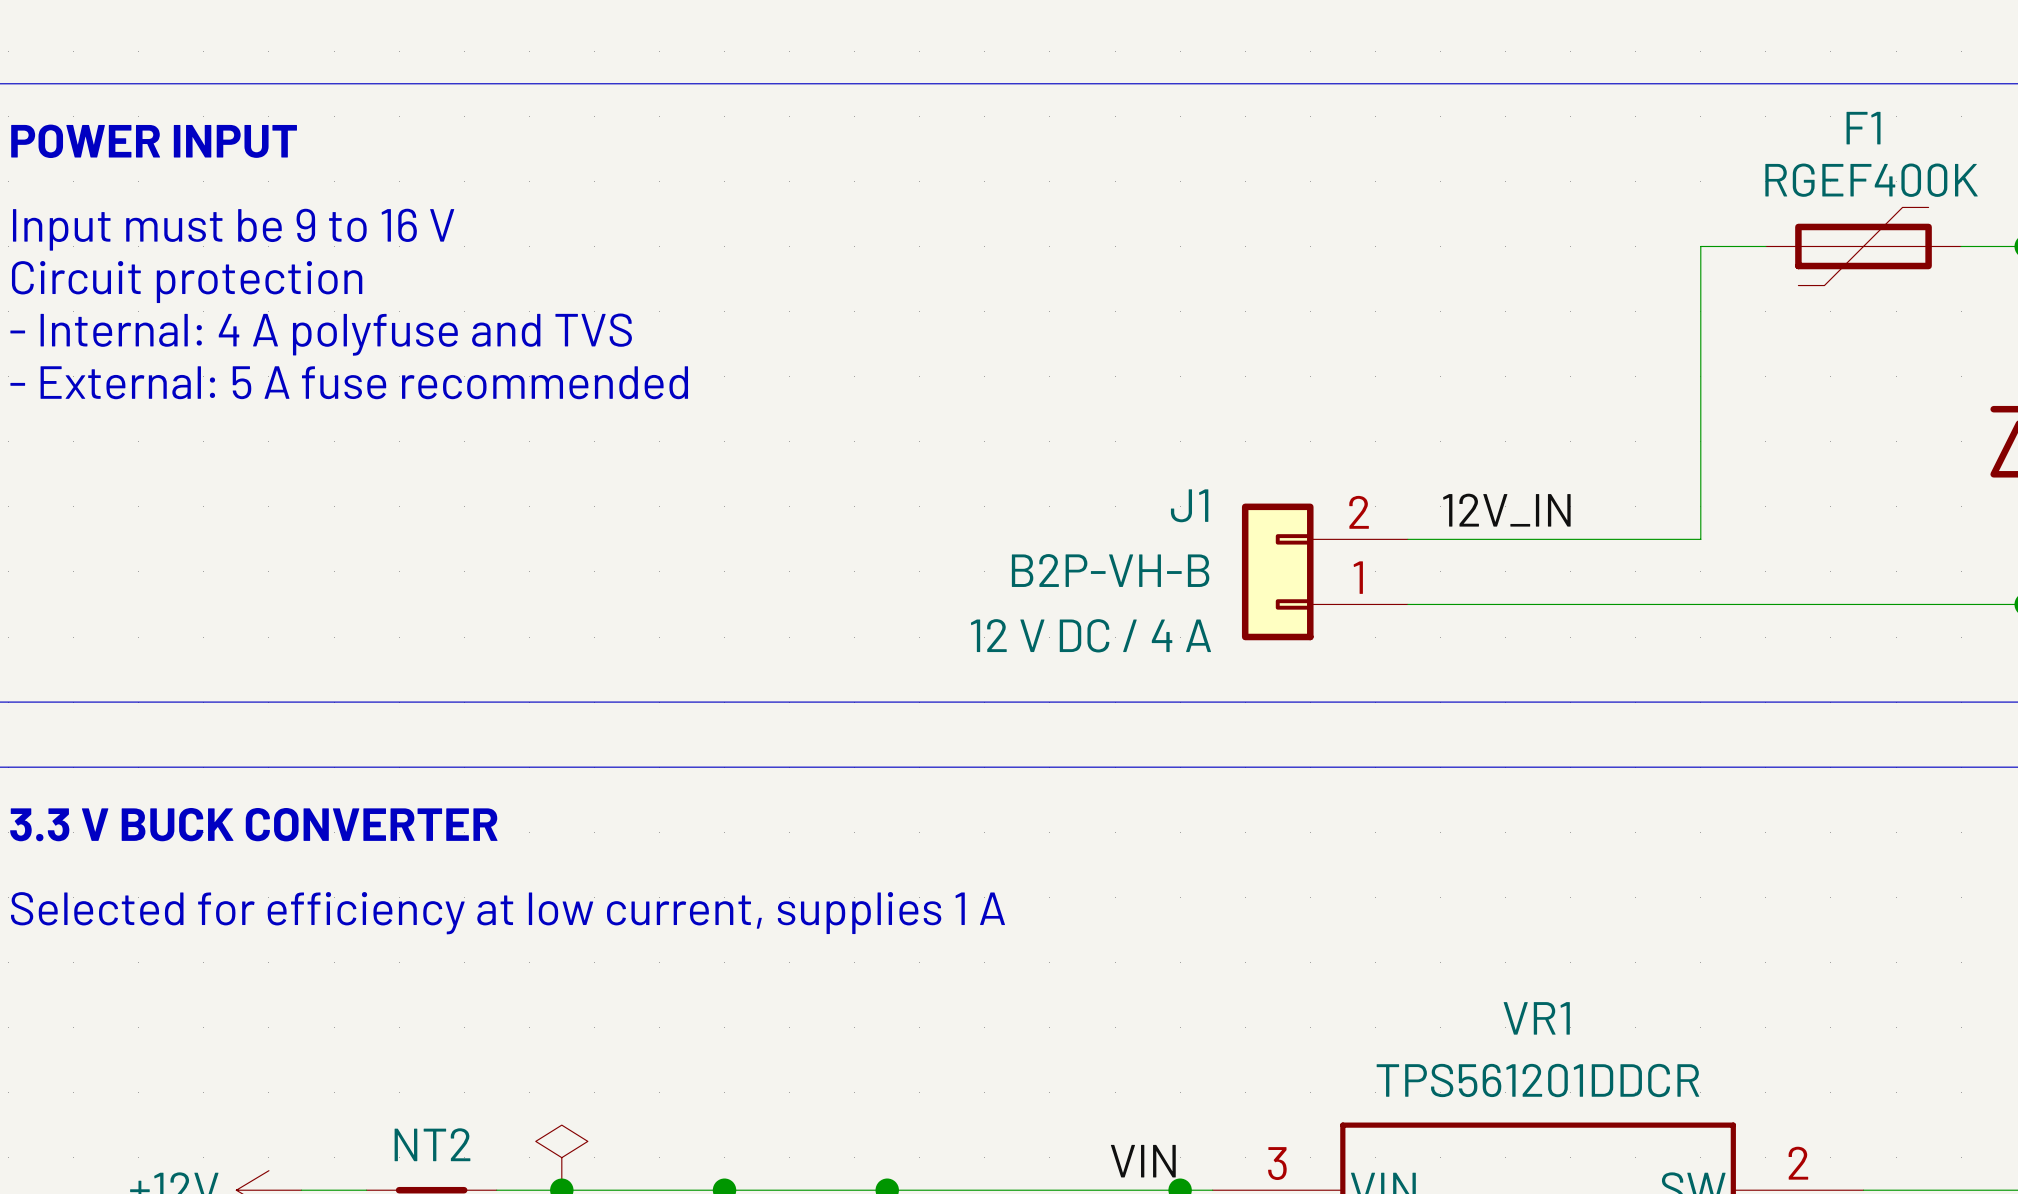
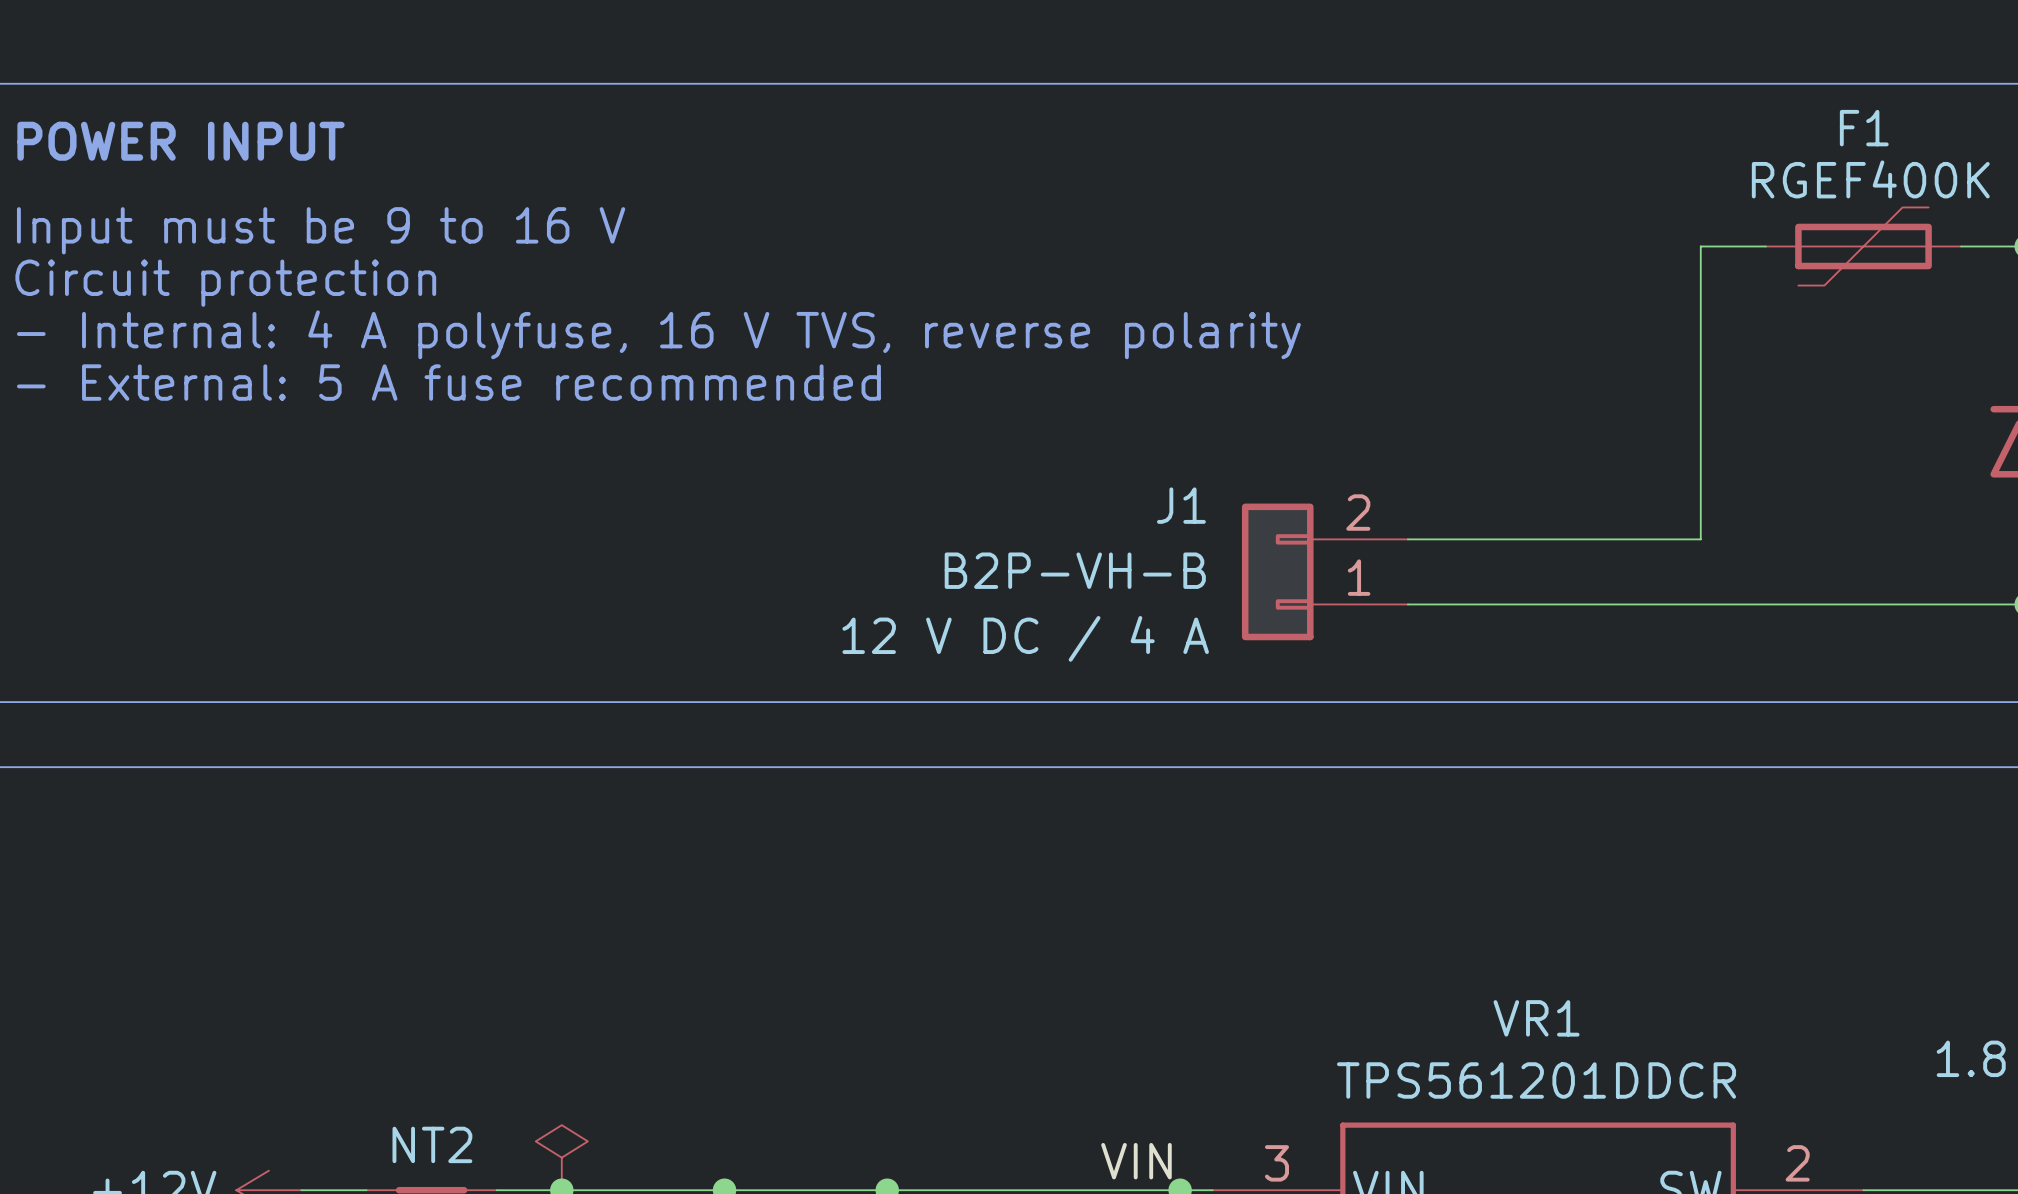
text: - Internal: 4 A polyfuse and TVS (321, 334) -> - Internal: 4 A polyfuse, 16 V TVS, reverse polarity (658, 334)
label: 12V_IN (1506, 510) -> none
text: 3.3 V BUCK CONVERTER (253, 824) -> none
text: Selected for efficiency at low current, supplies 1 A (508, 913) -> none

